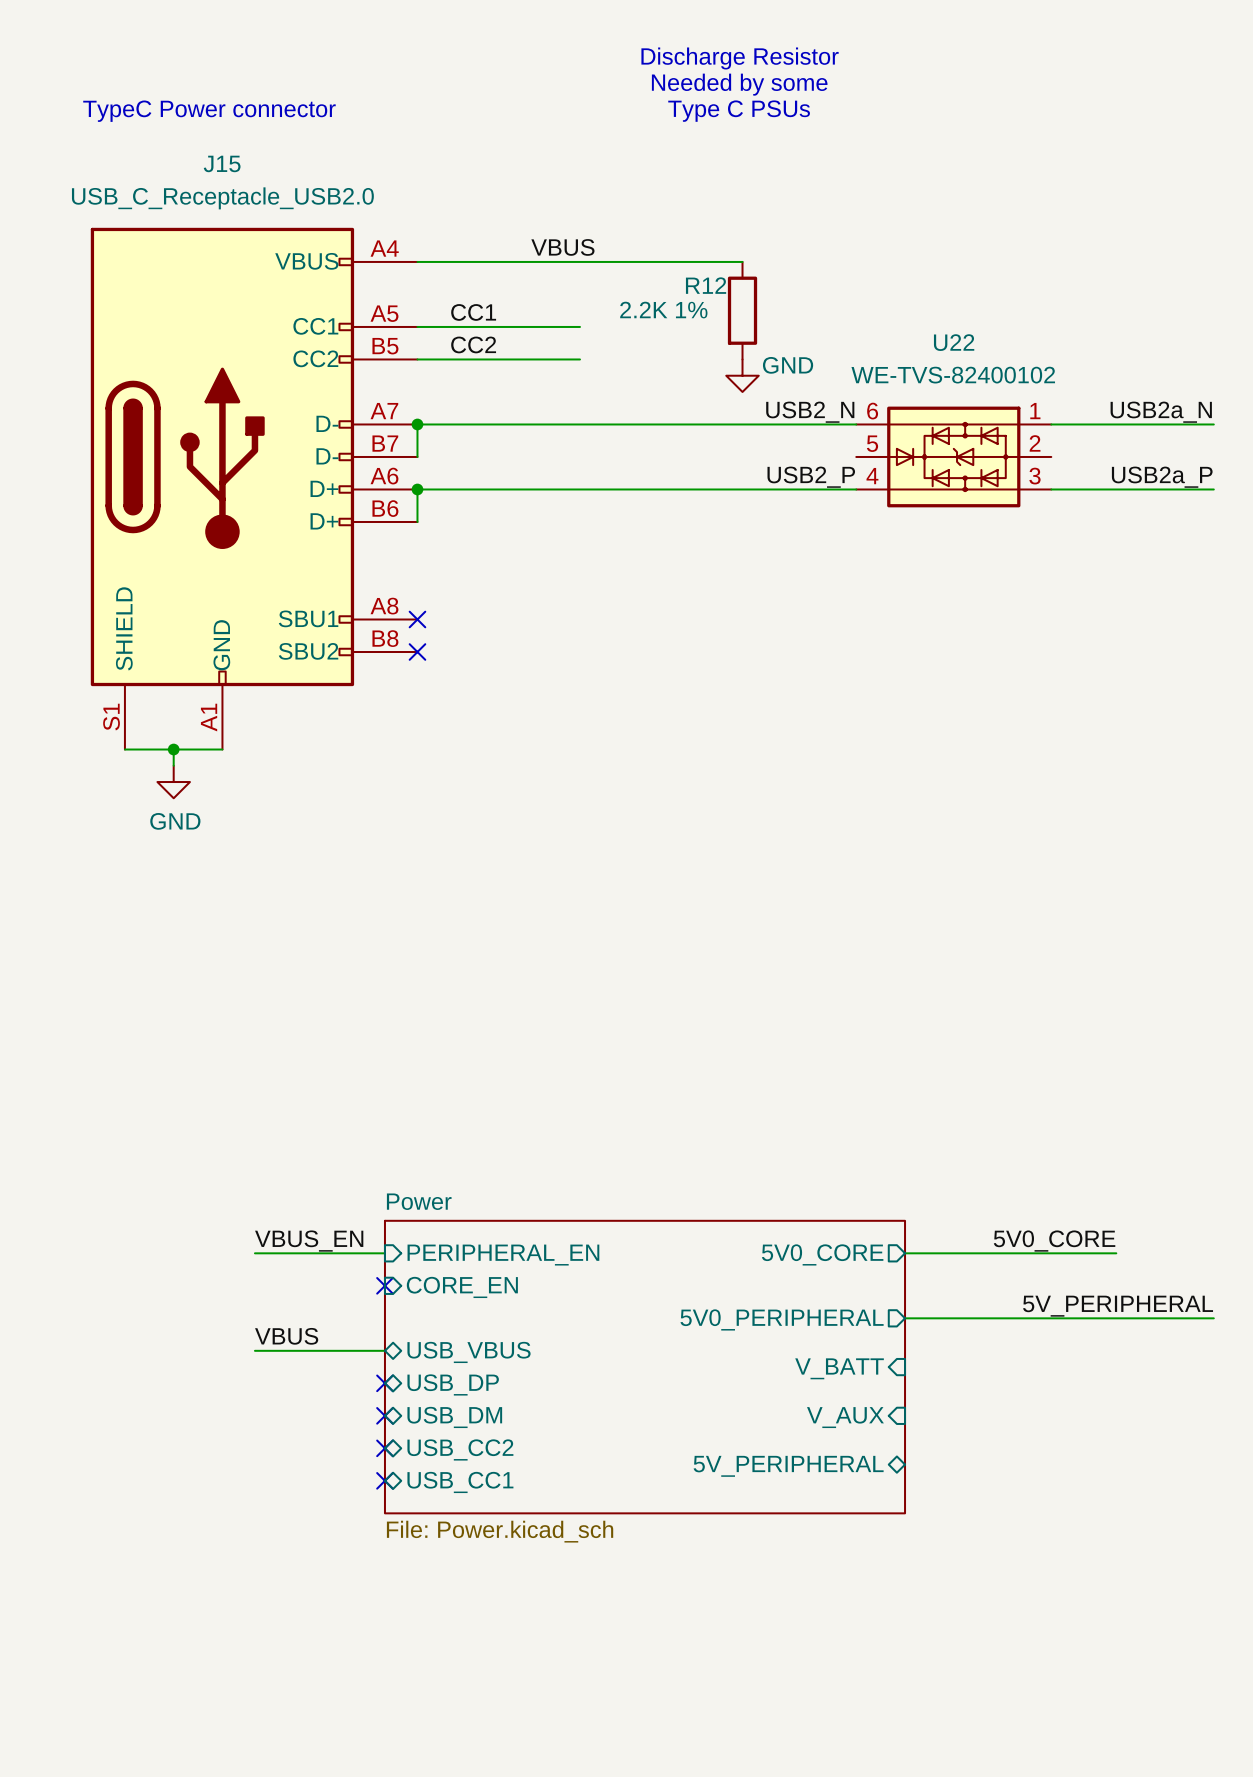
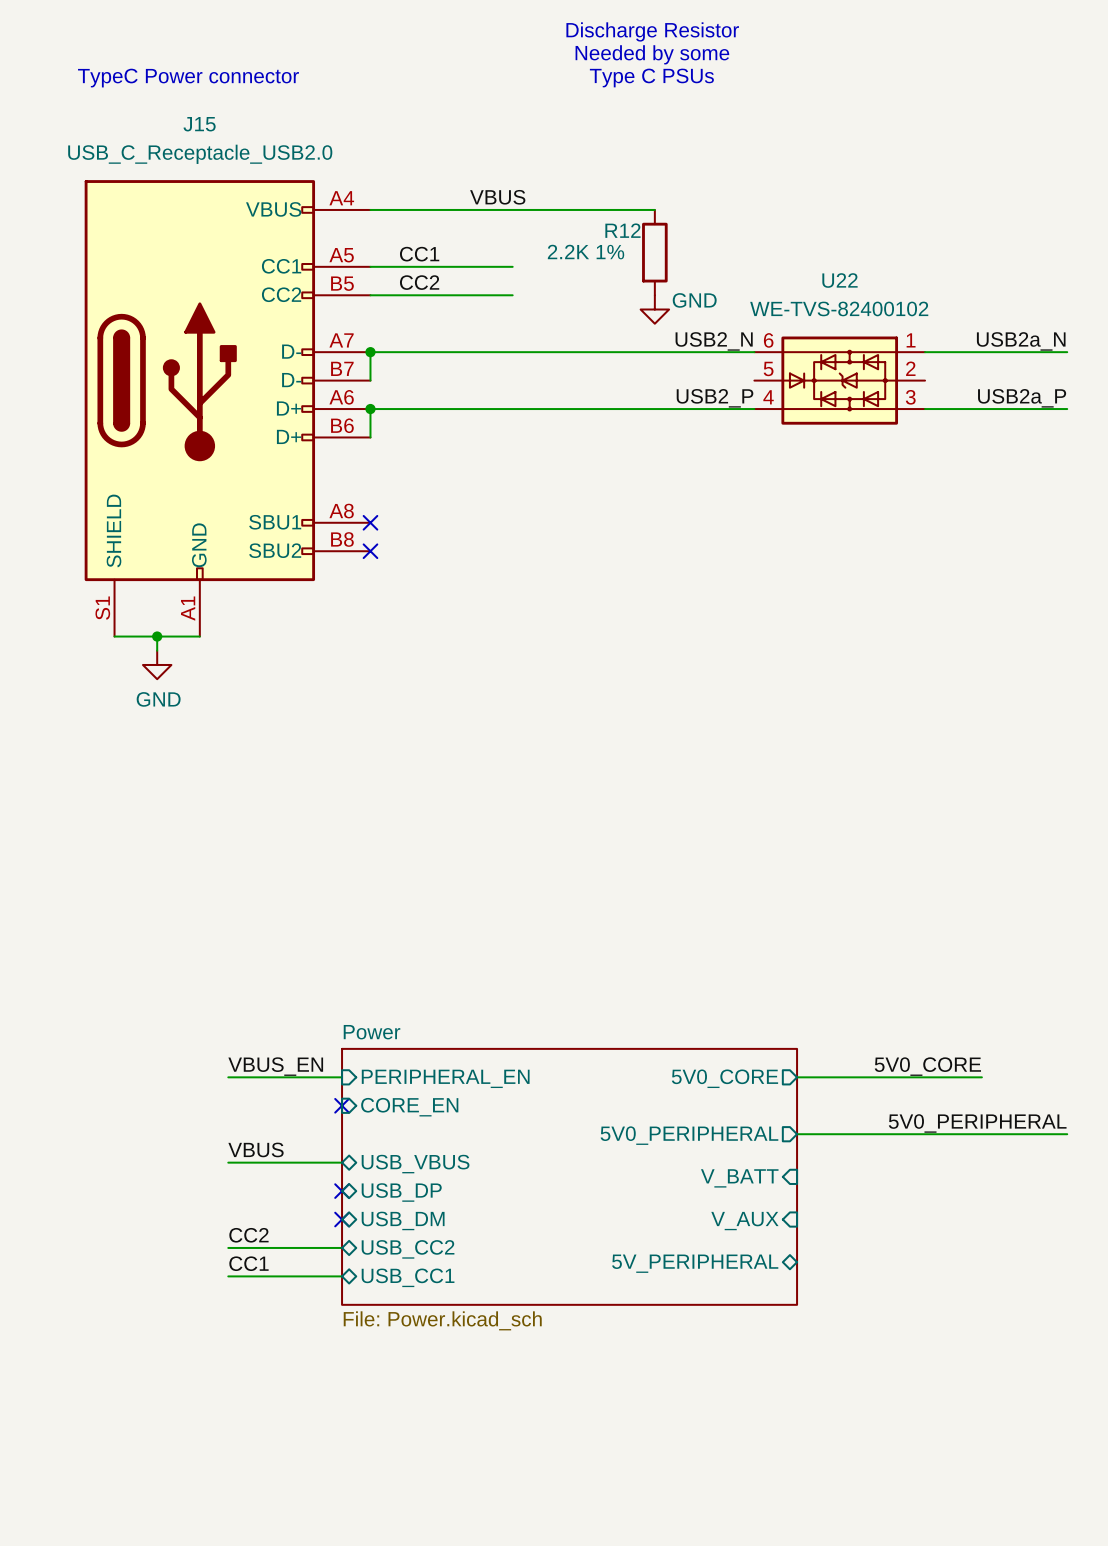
label: 5V_PERIPHERAL (1118, 1306) -> 5V0_PERIPHERAL (977, 1123)
label: none -> CC2 (248, 1235)
wire: none -> (228, 1247) (342, 1247)
no-connect mark: (384, 1448) -> none
label: none -> CC1 (248, 1263)
wire: none -> (228, 1276) (342, 1276)
no-connect mark: (384, 1480) -> none

